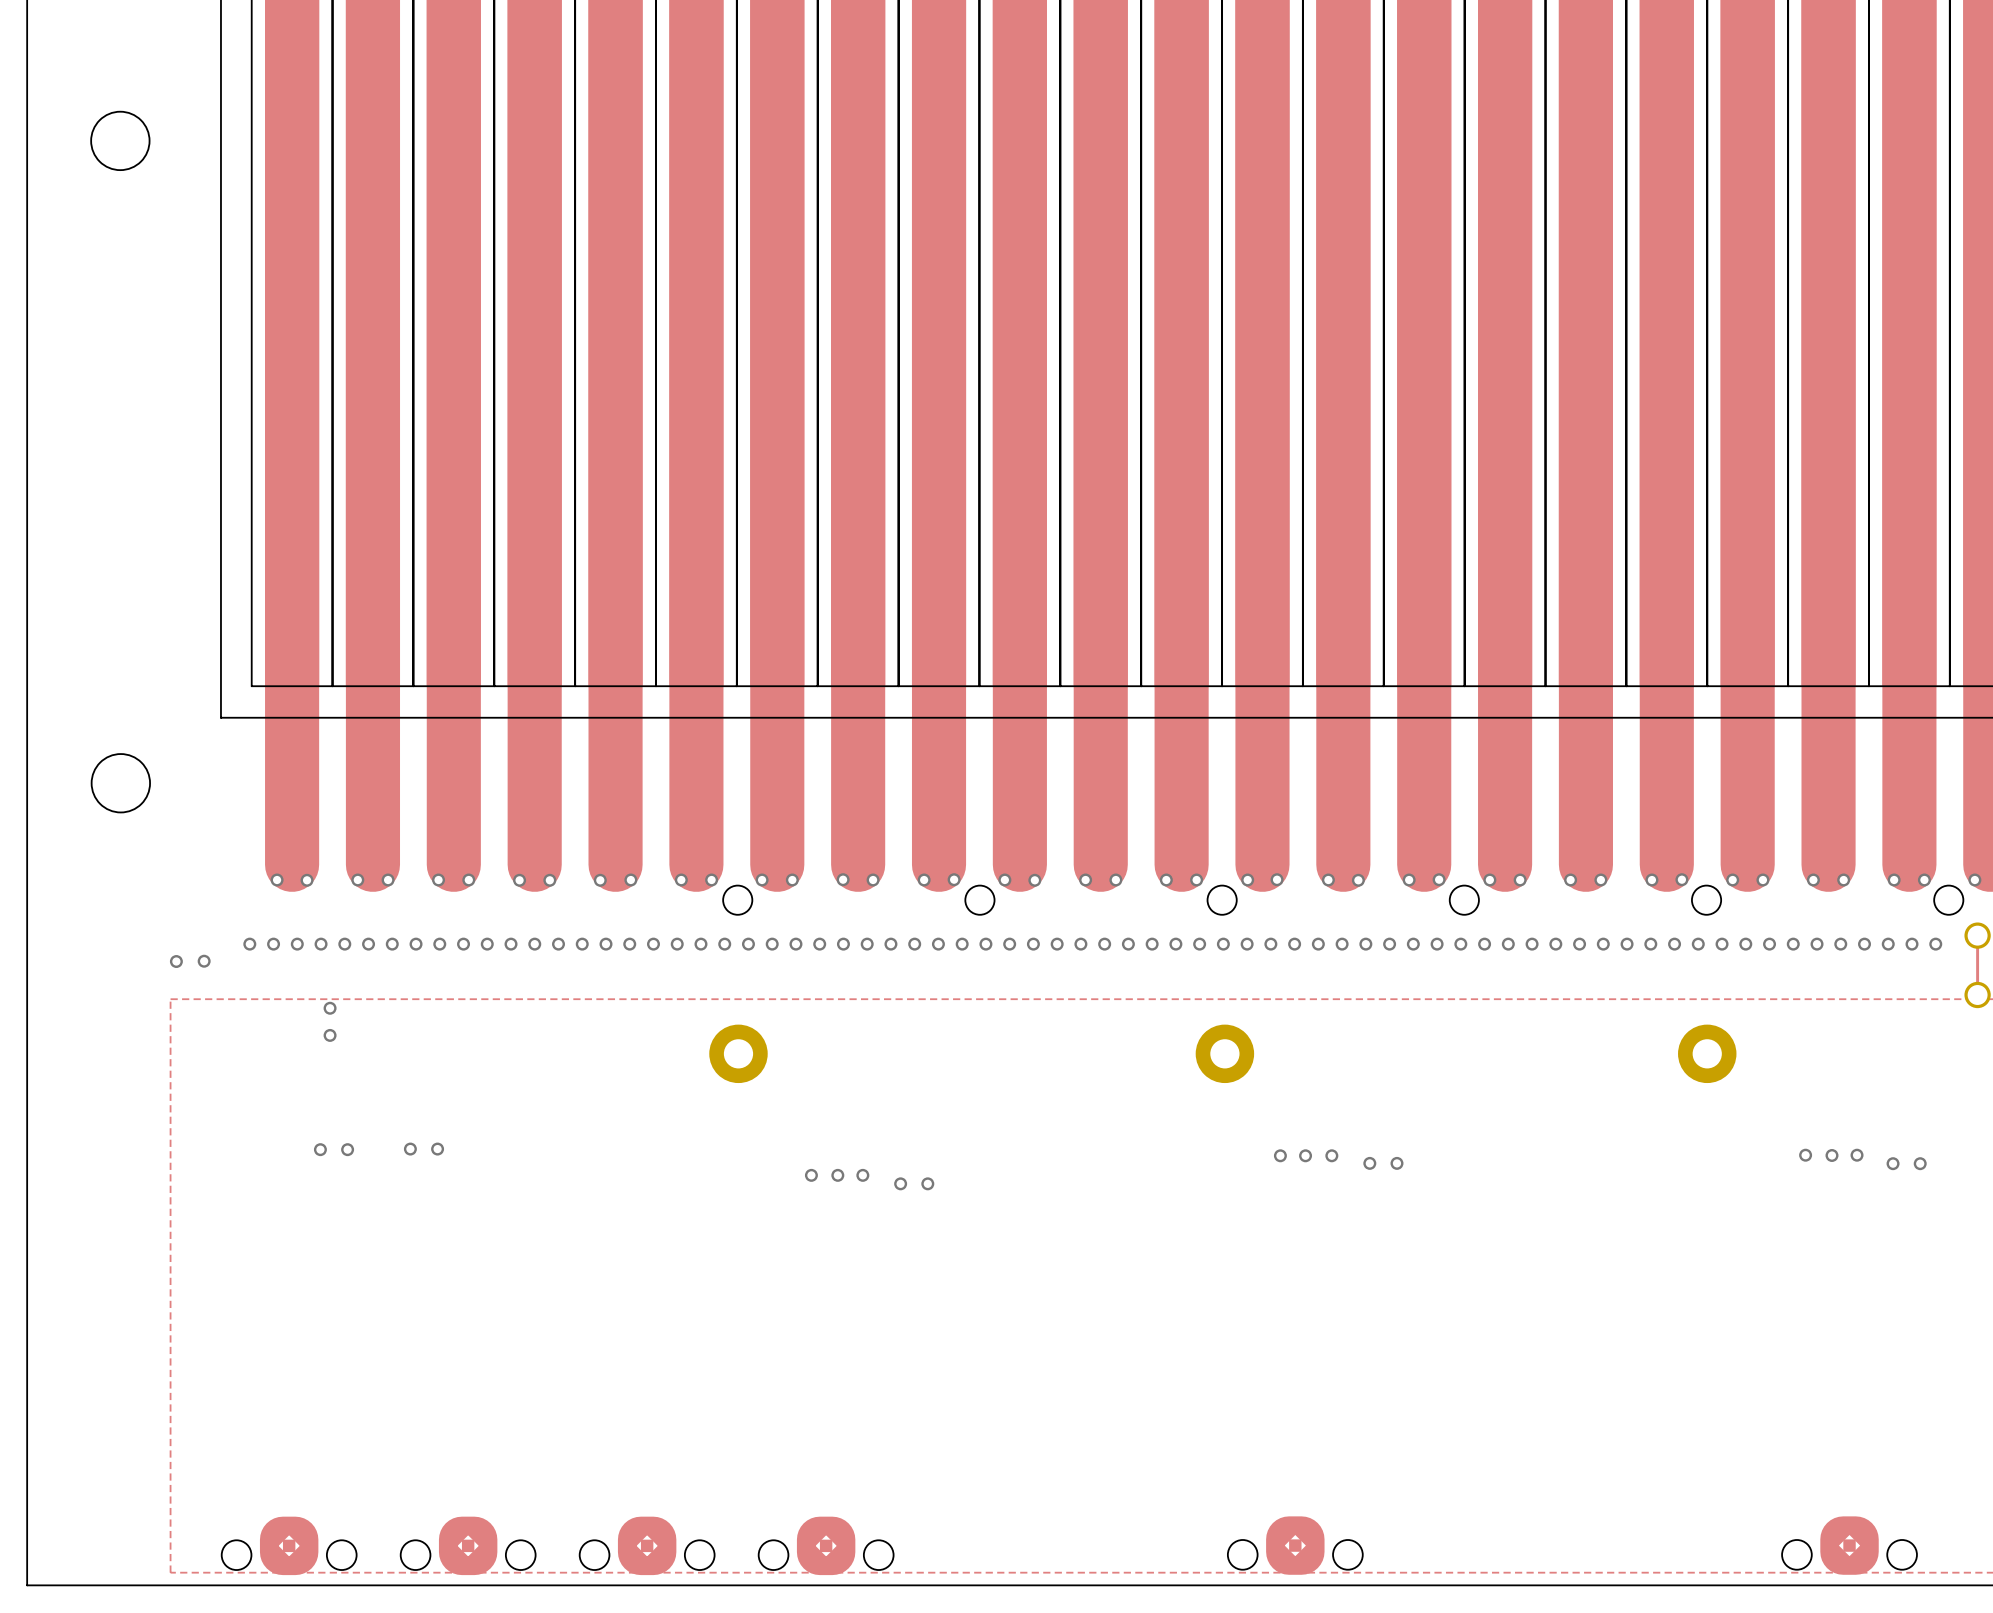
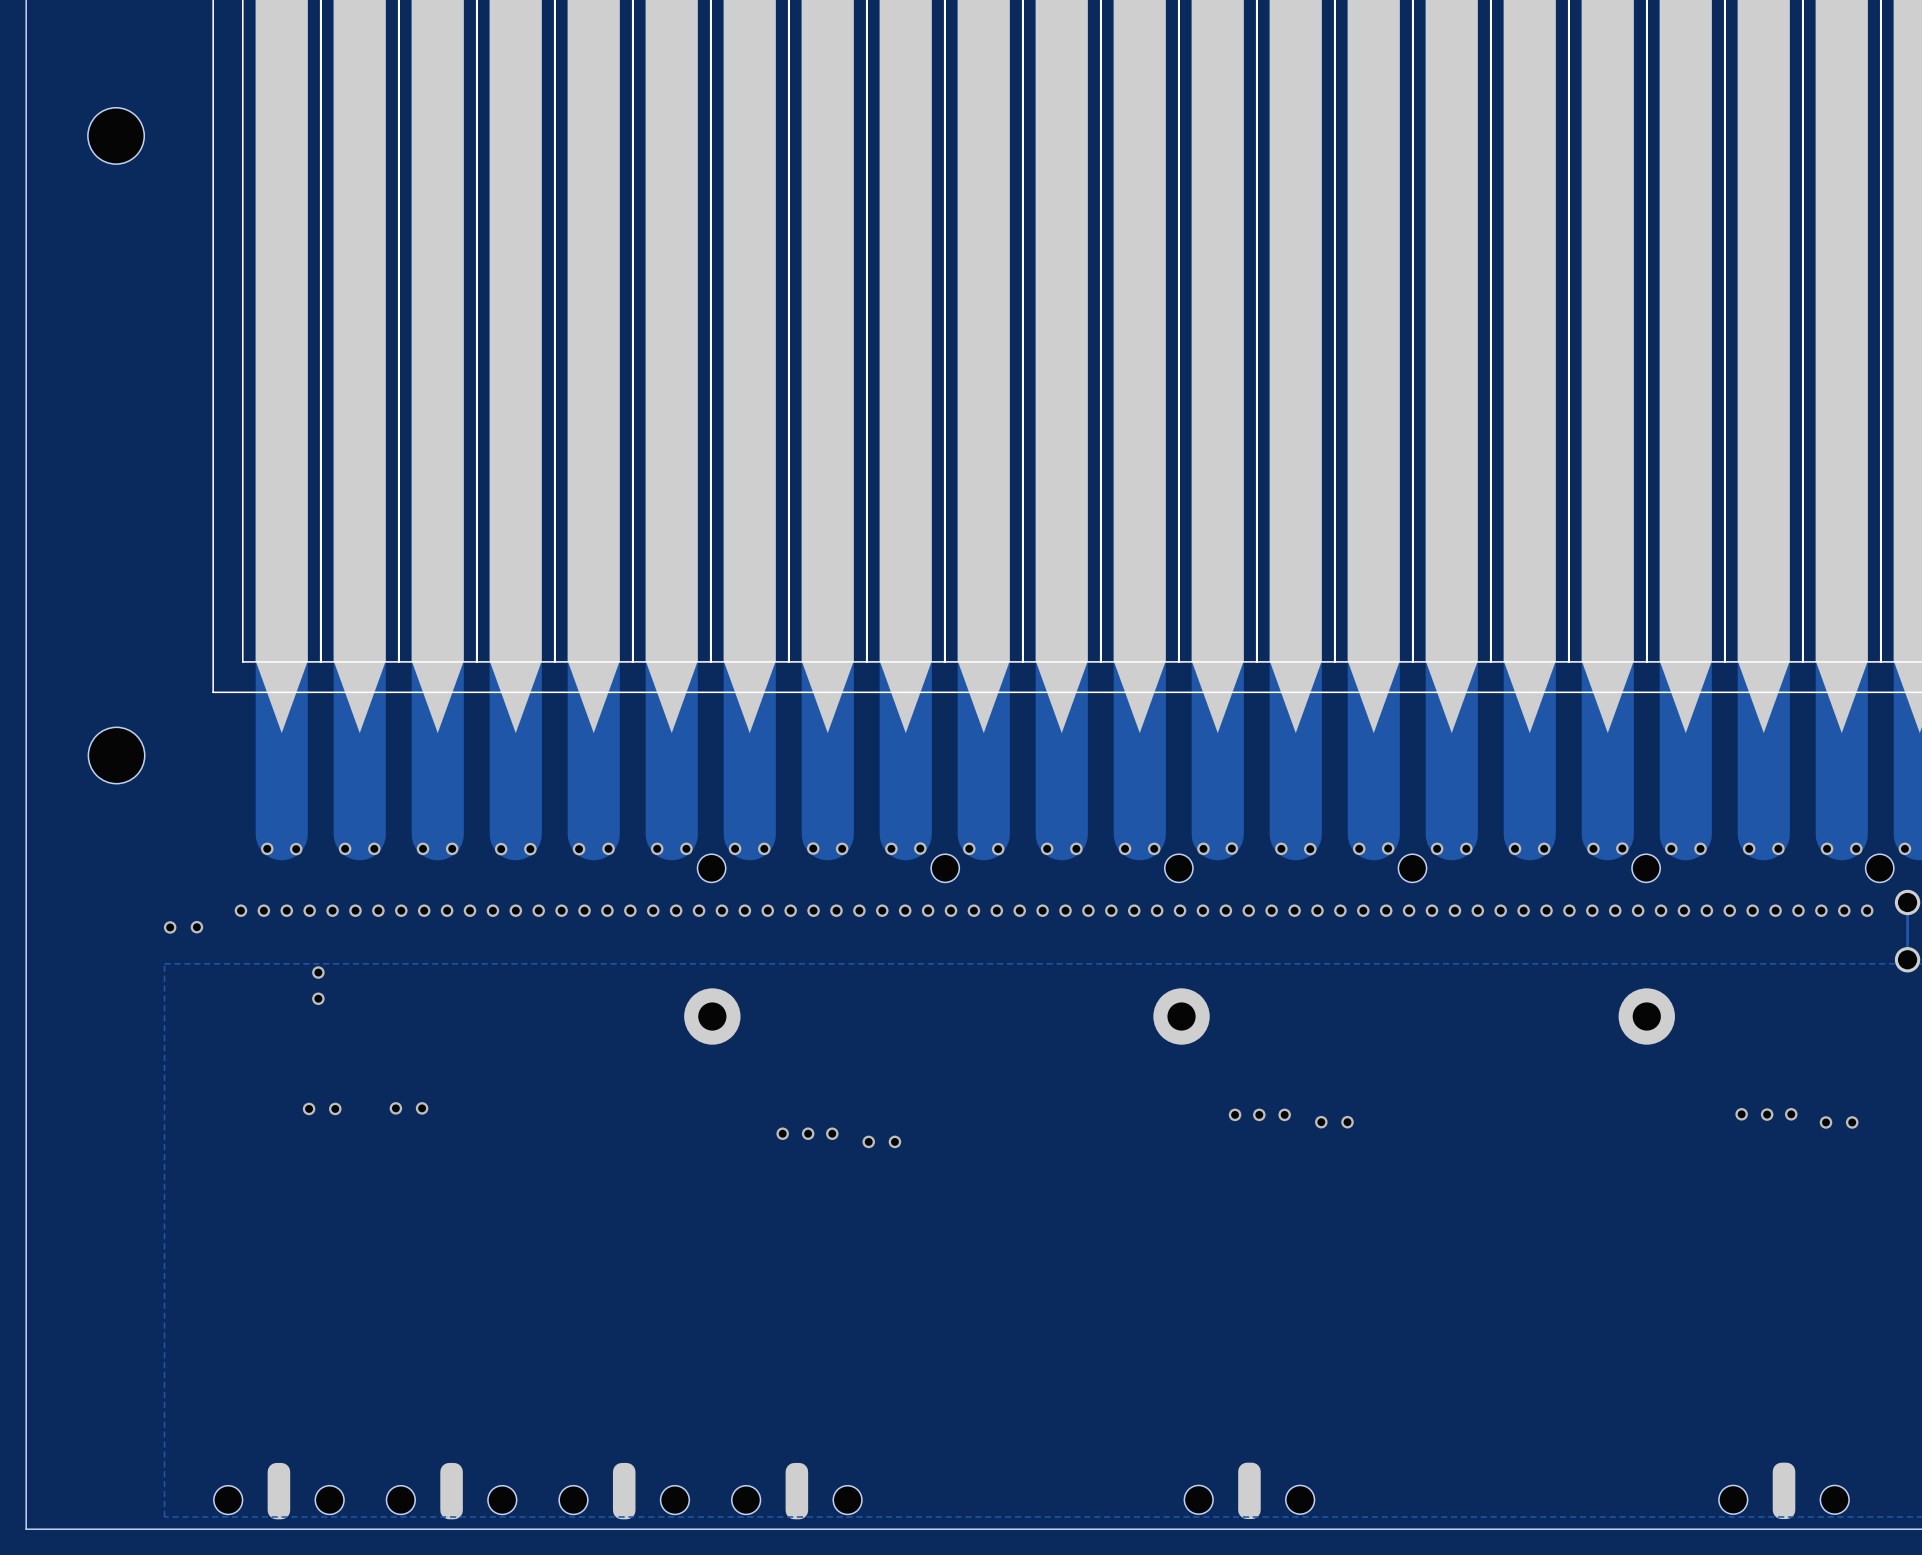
part footprint: [221, 1516, 357, 1576] -> [213, 1462, 344, 1520]
part footprint: [400, 1516, 536, 1576] -> [386, 1462, 517, 1520]
part footprint: [579, 1516, 715, 1576] -> [559, 1462, 690, 1520]
part footprint: [758, 1516, 894, 1576] -> [731, 1462, 862, 1520]
part footprint: [1227, 1516, 1363, 1575] -> [1184, 1462, 1315, 1520]
part footprint: [1782, 1516, 1917, 1575] -> [1718, 1462, 1850, 1520]

